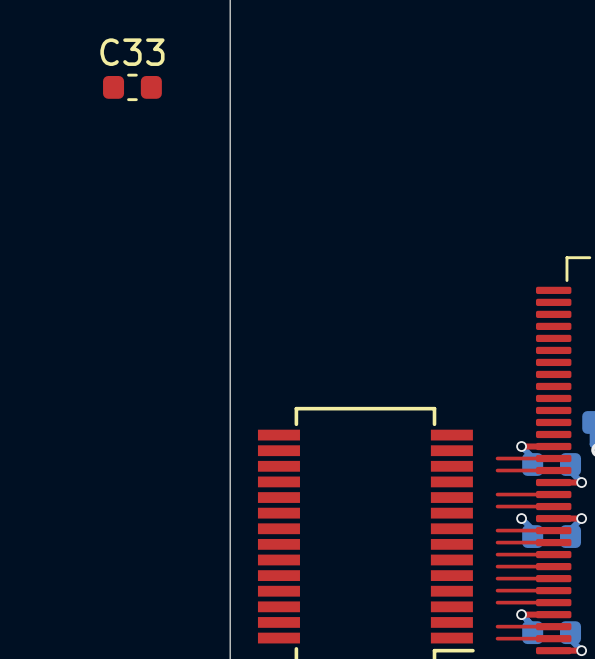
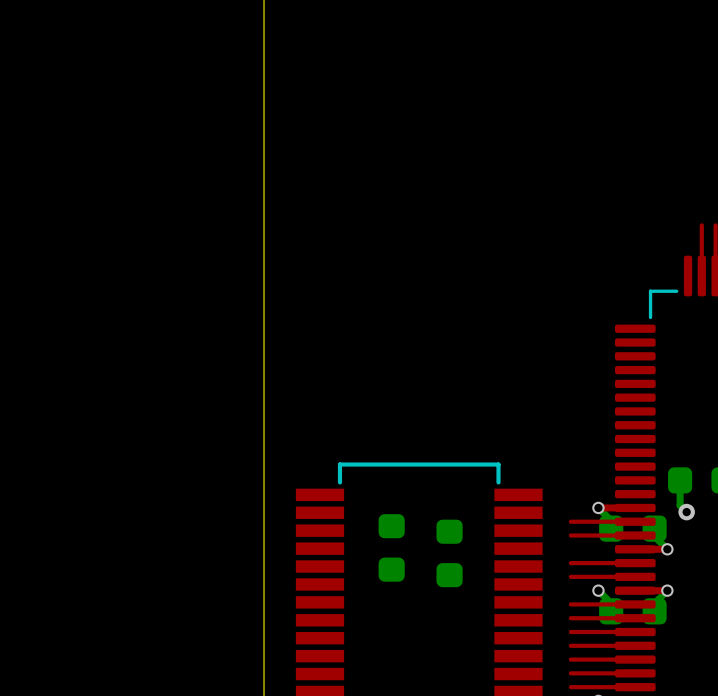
C33 side: top (132, 87) -> bottom (391, 547)
part: none -> (449, 553)

